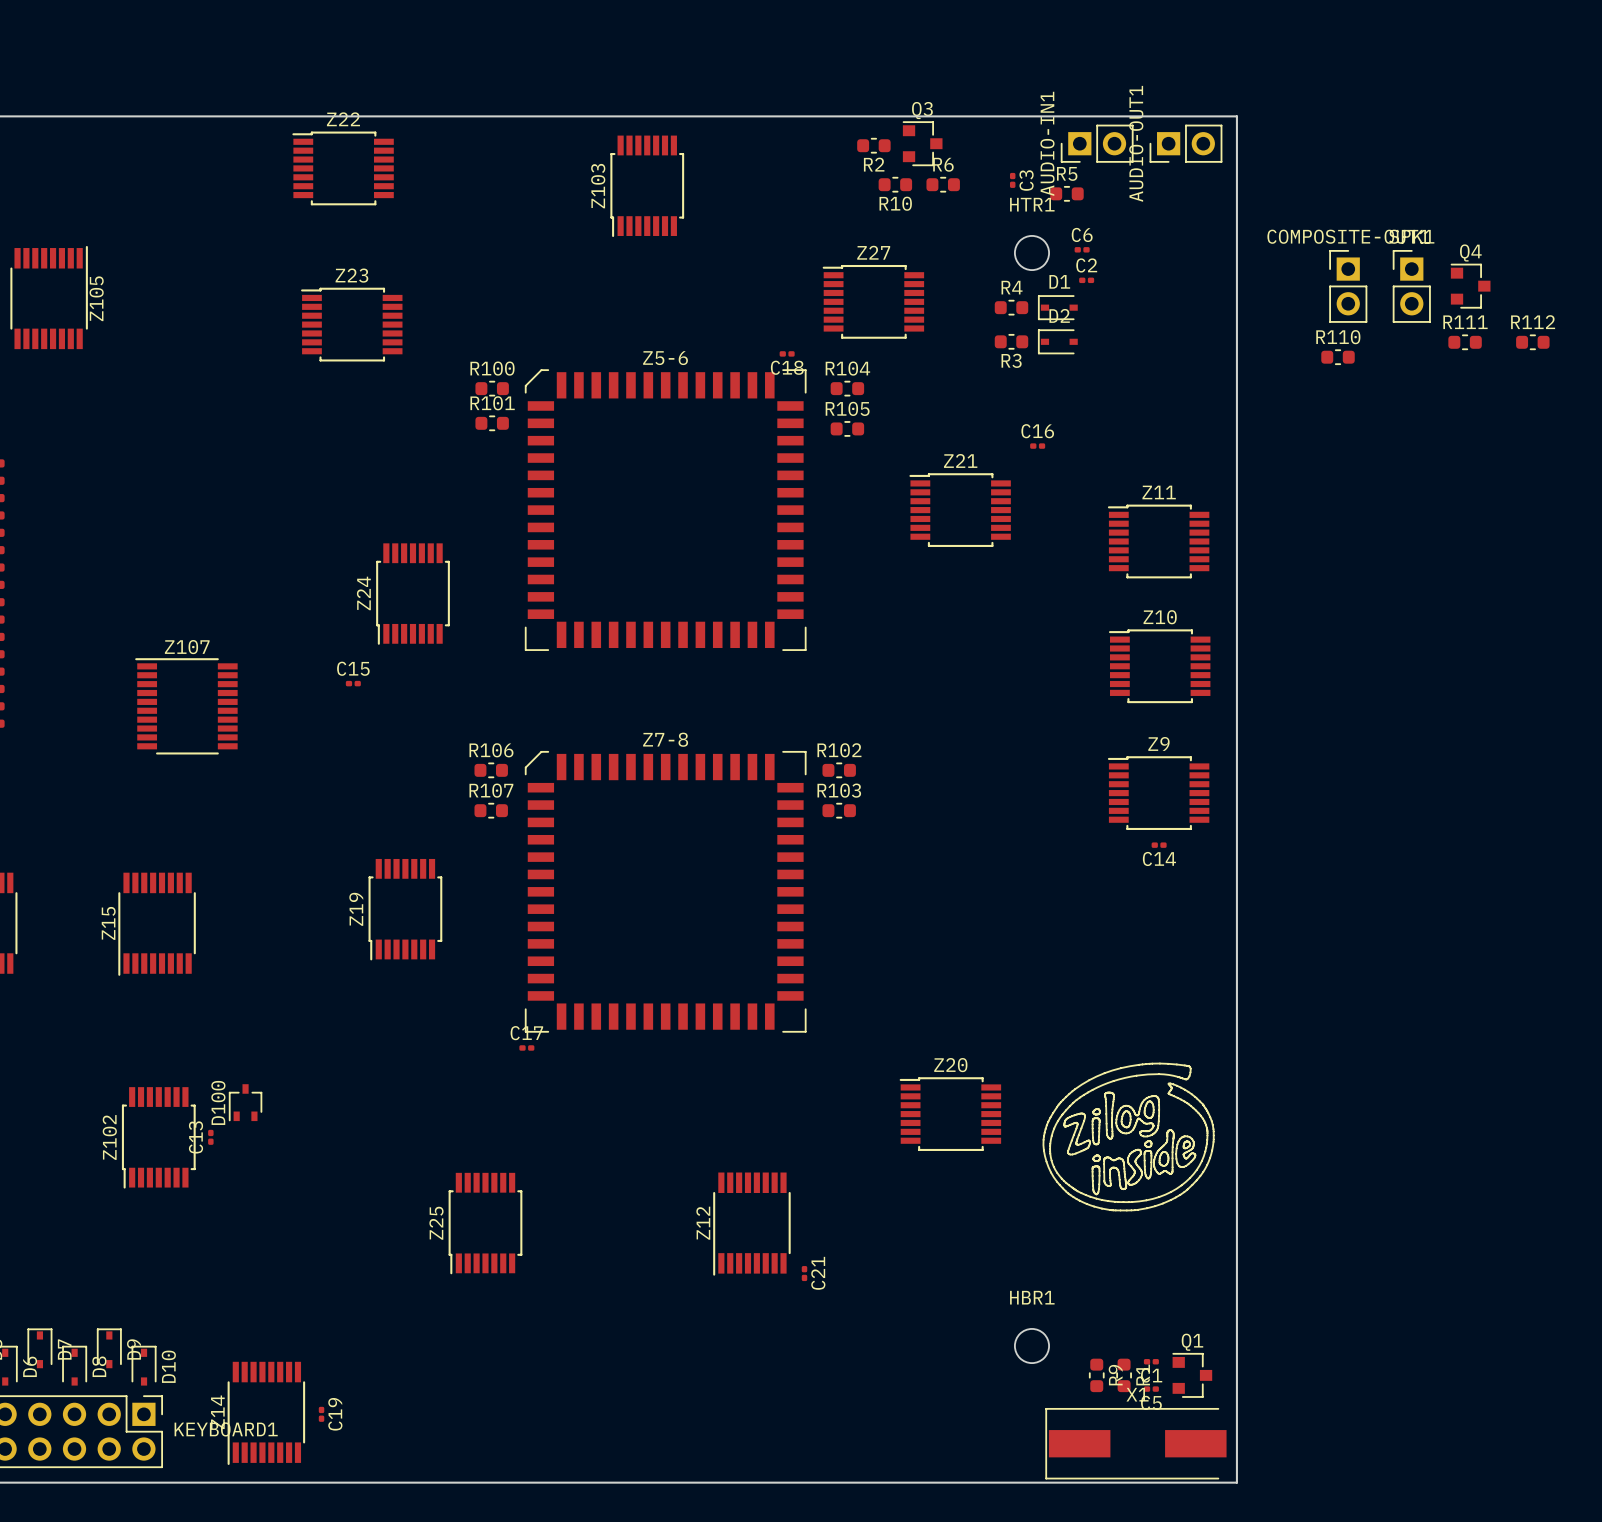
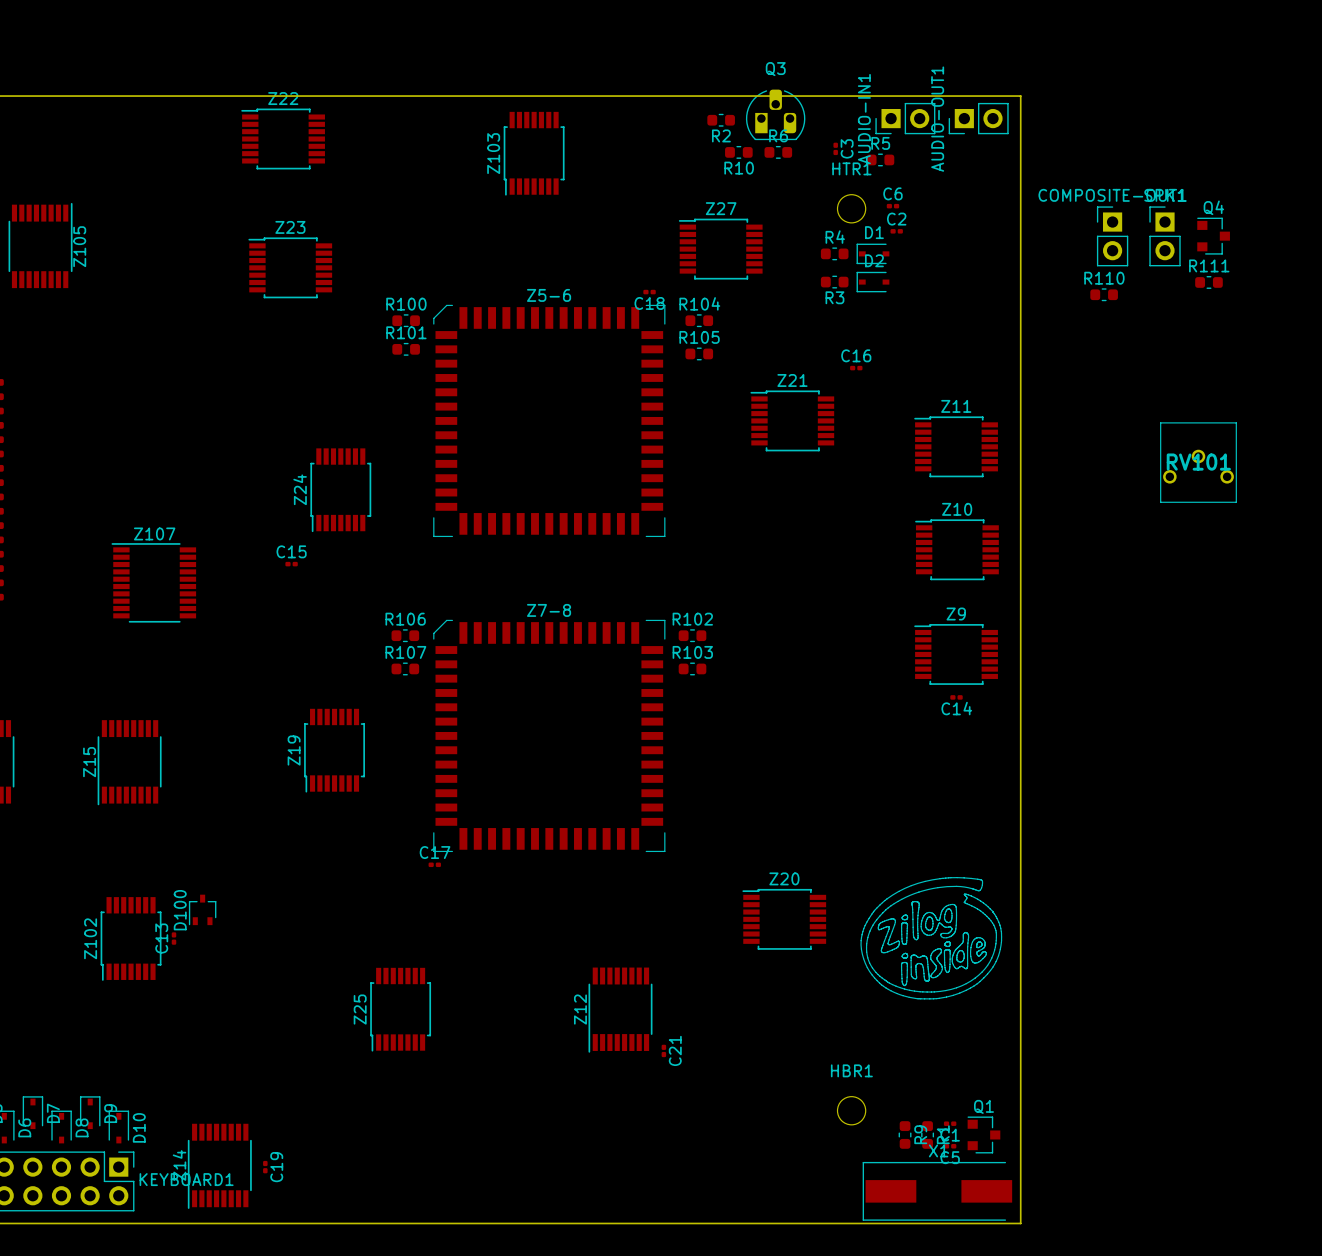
Q3 footprint: [902, 121, 943, 167] -> [745, 89, 806, 141]
R112: (1532, 342) -> none
RV101: none -> (1198, 462)

